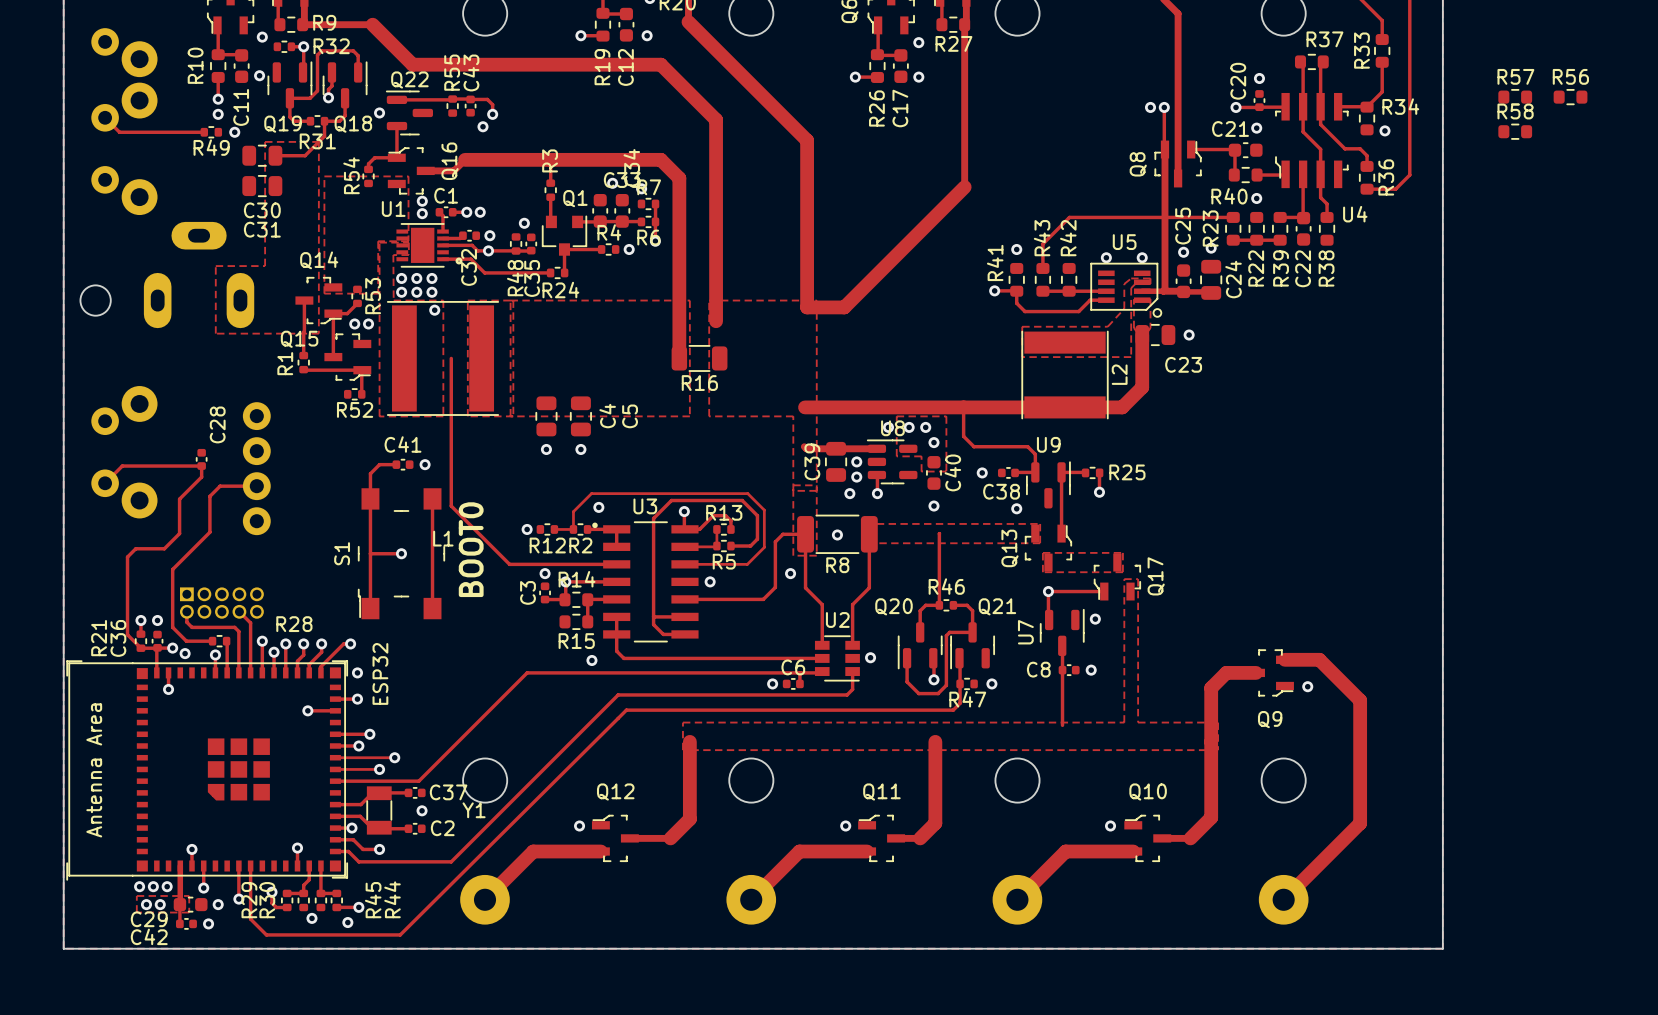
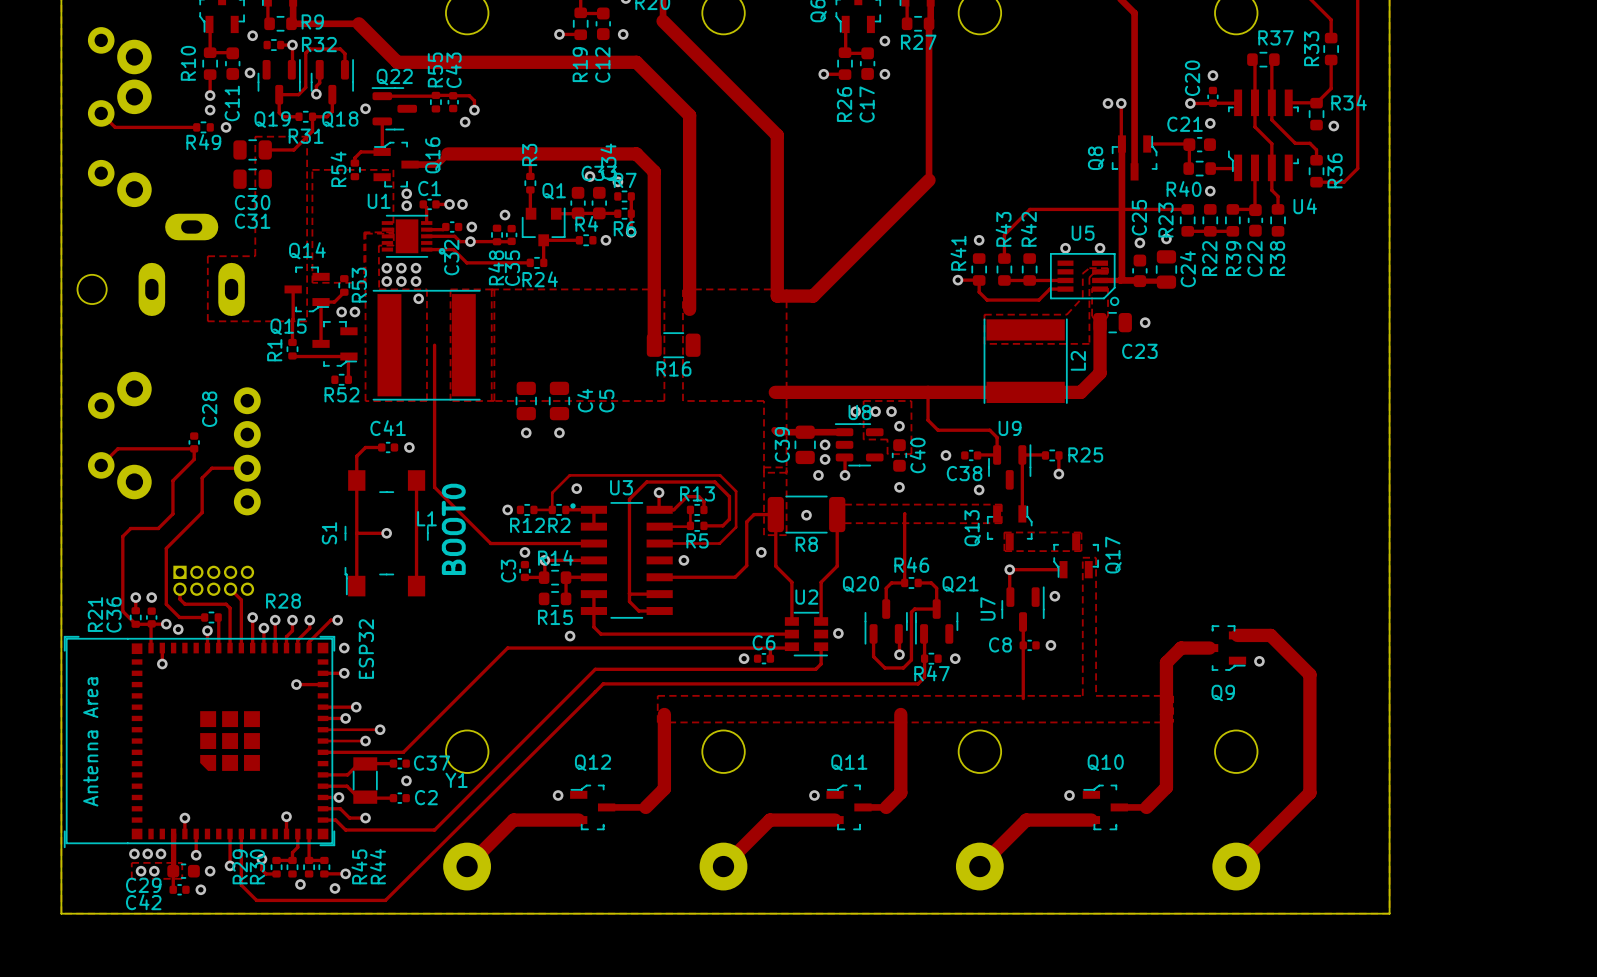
R57: (1515, 97) -> none
R56: (1570, 97) -> none
R58: (1515, 131) -> none

